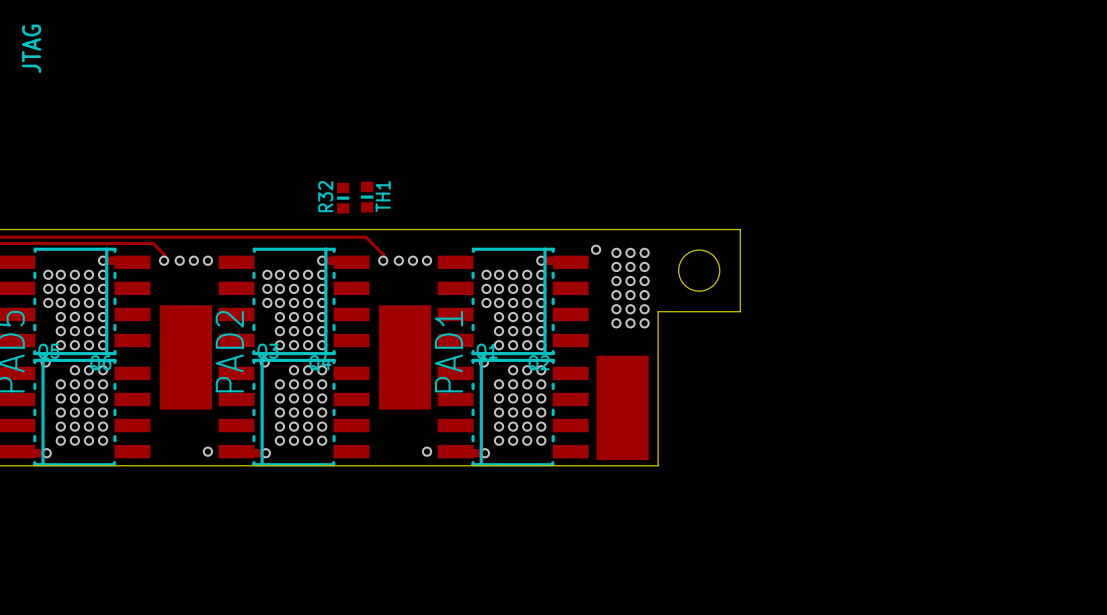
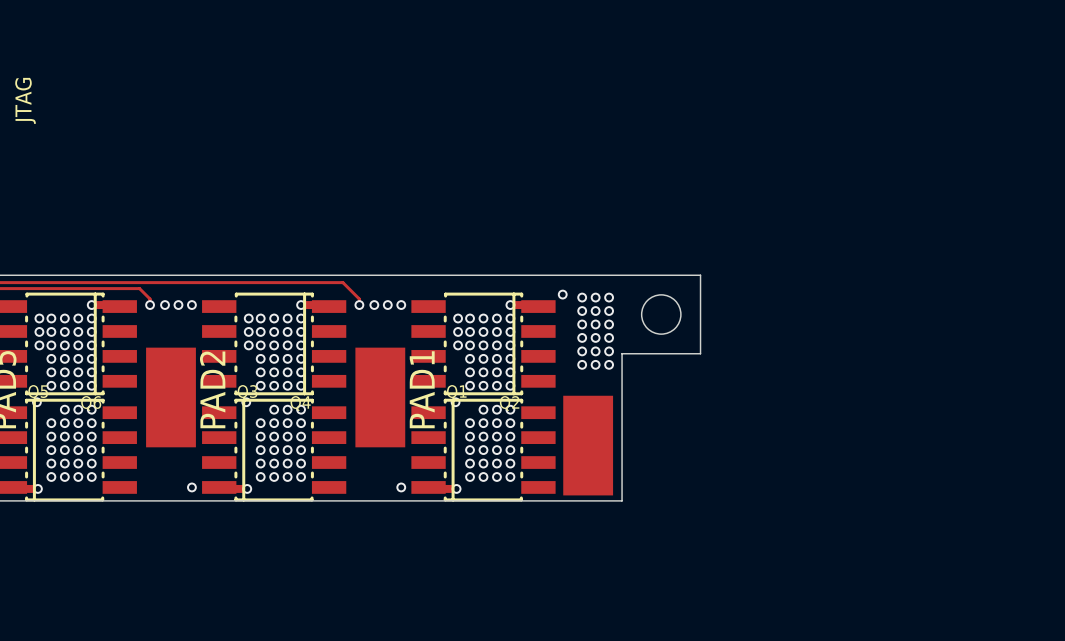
TH1: (367, 197) -> none
R32: (343, 198) -> none

